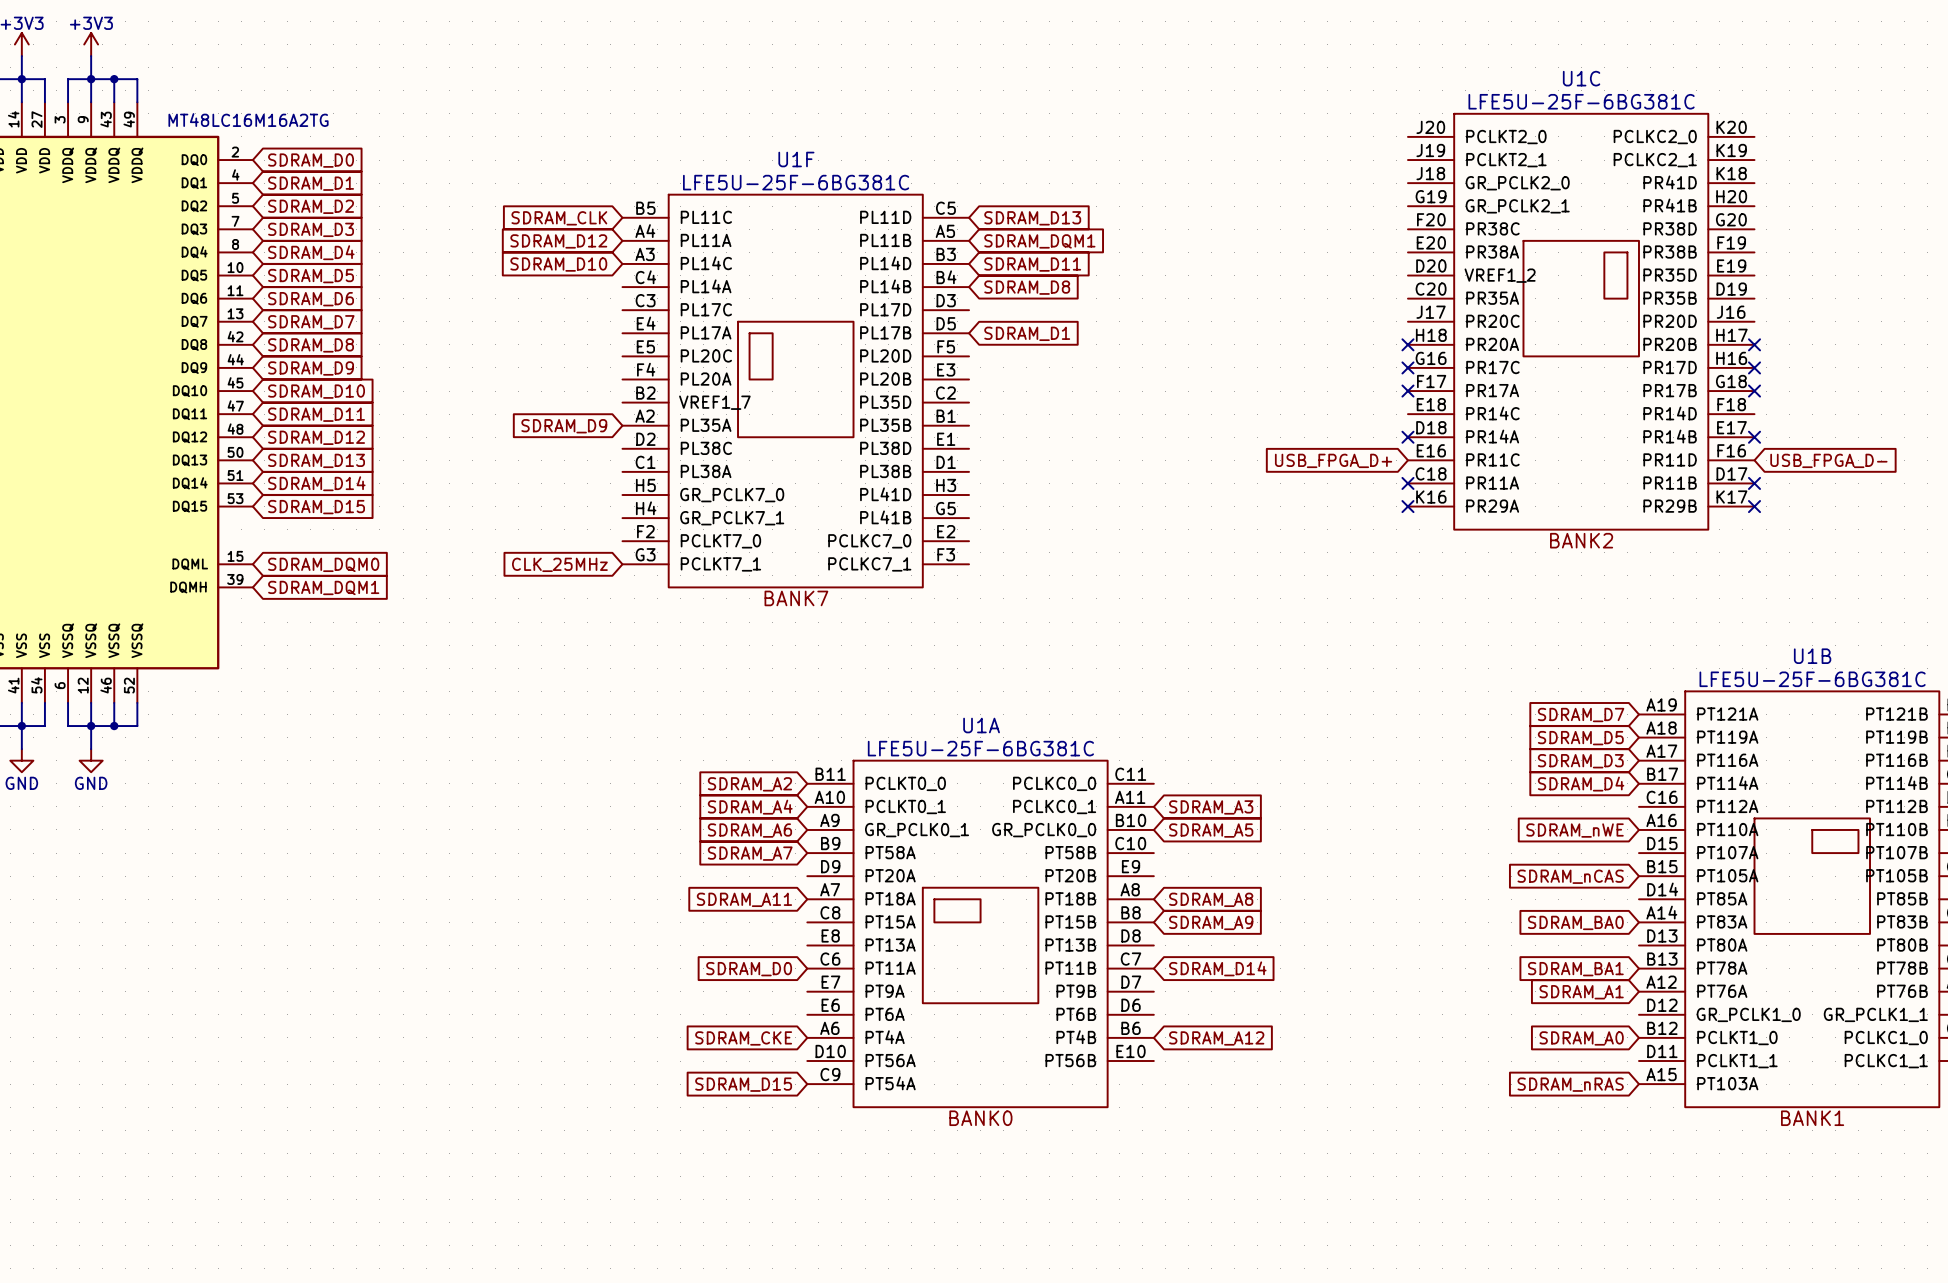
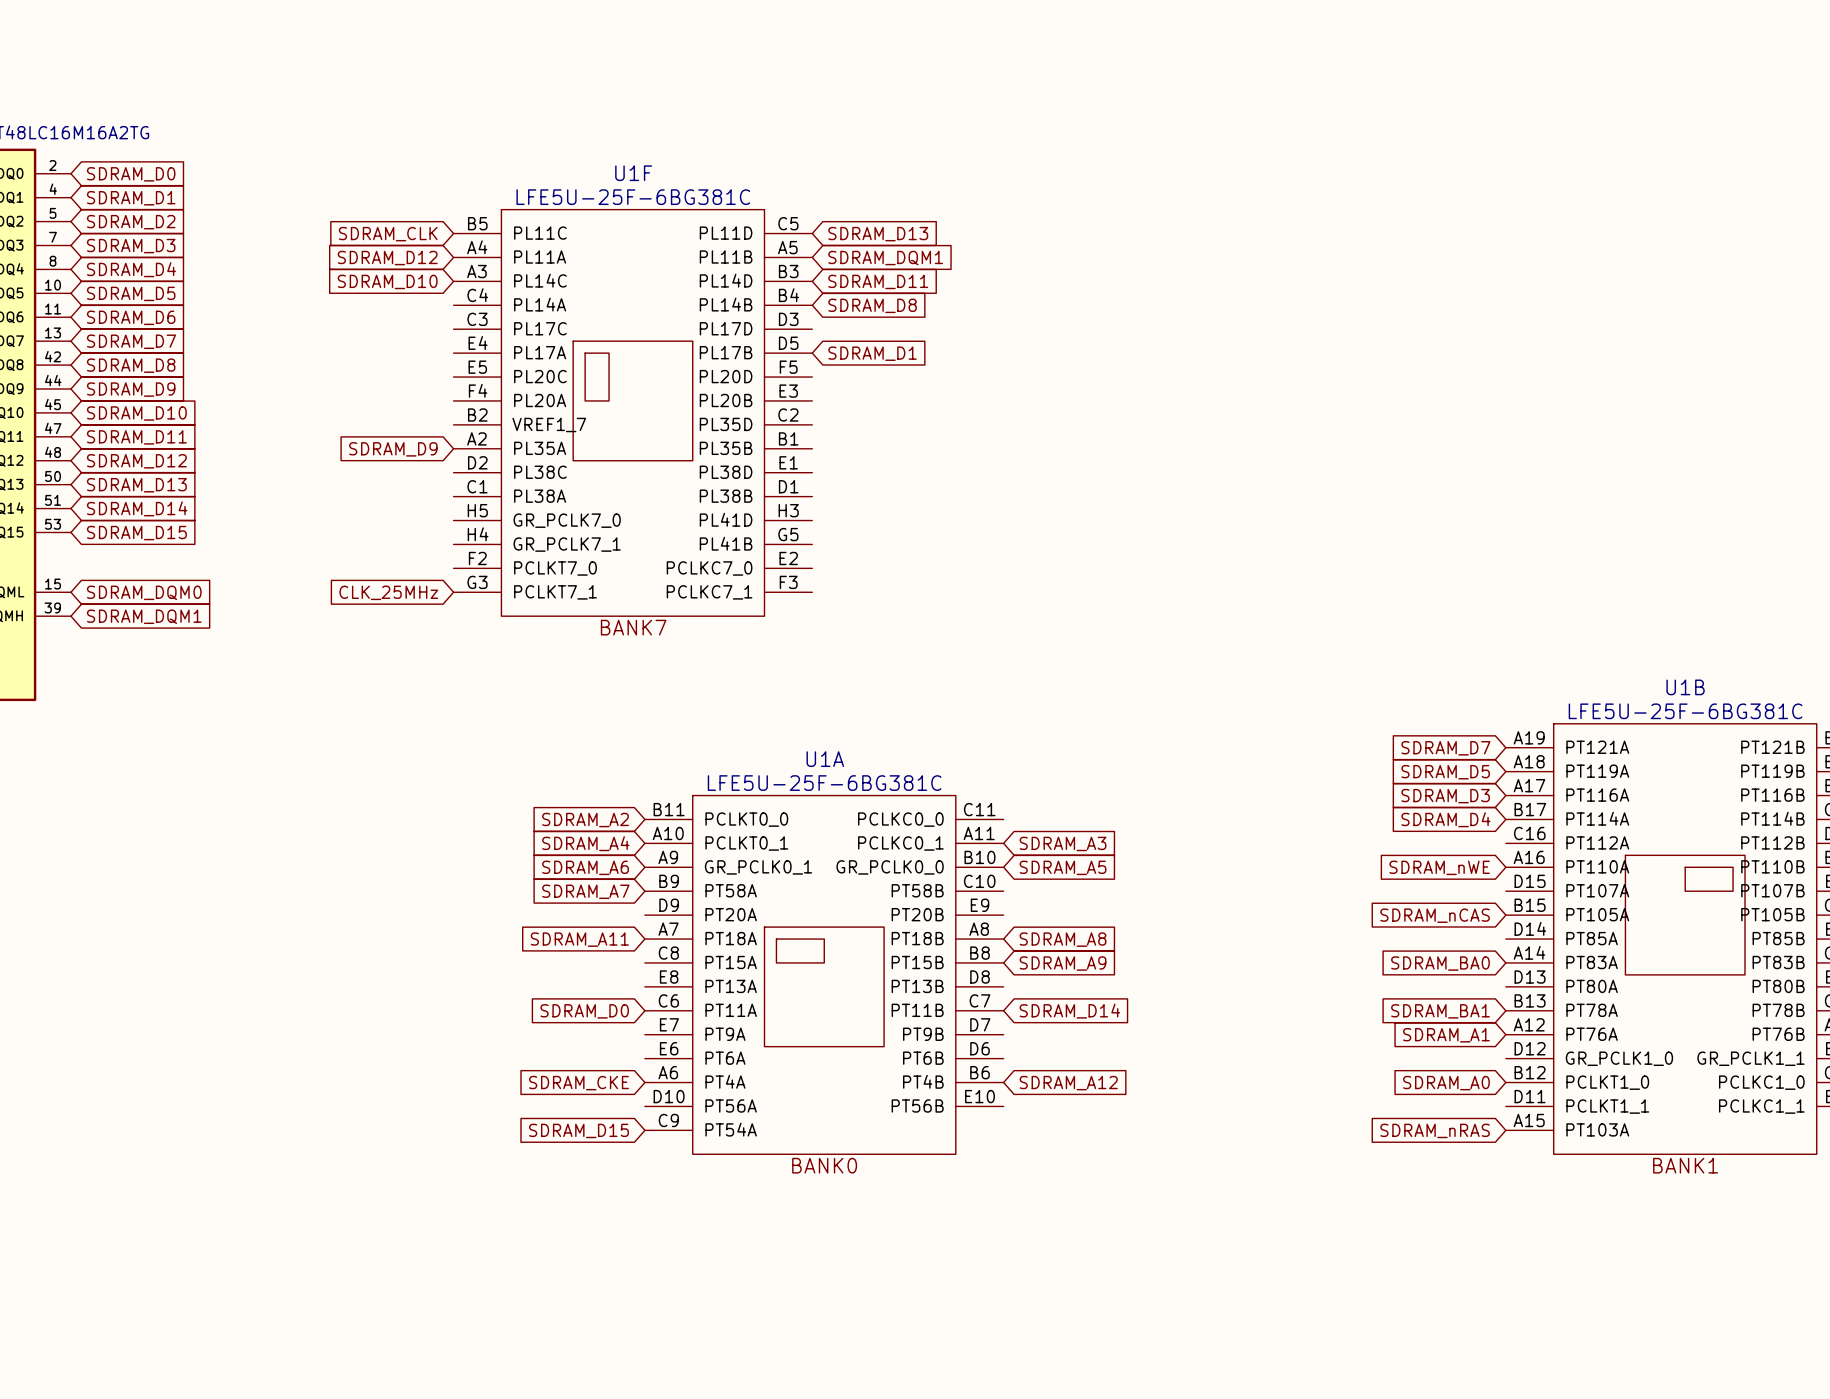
U1C: LFE5U-25F-6BG381C (1581, 321) -> none
no-connect mark: (1407, 344) -> none
no-connect mark: (1754, 344) -> none
no-connect mark: (1407, 367) -> none
no-connect mark: (1754, 367) -> none
no-connect mark: (1407, 391) -> none
no-connect mark: (1754, 391) -> none
no-connect mark: (1407, 437) -> none
no-connect mark: (1754, 437) -> none
global label: USB_FPGA_D+ (1333, 460) -> none
global label: USB_FPGA_D- (1828, 460) -> none
no-connect mark: (1407, 483) -> none
no-connect mark: (1754, 483) -> none
no-connect mark: (1407, 506) -> none
no-connect mark: (1754, 506) -> none

